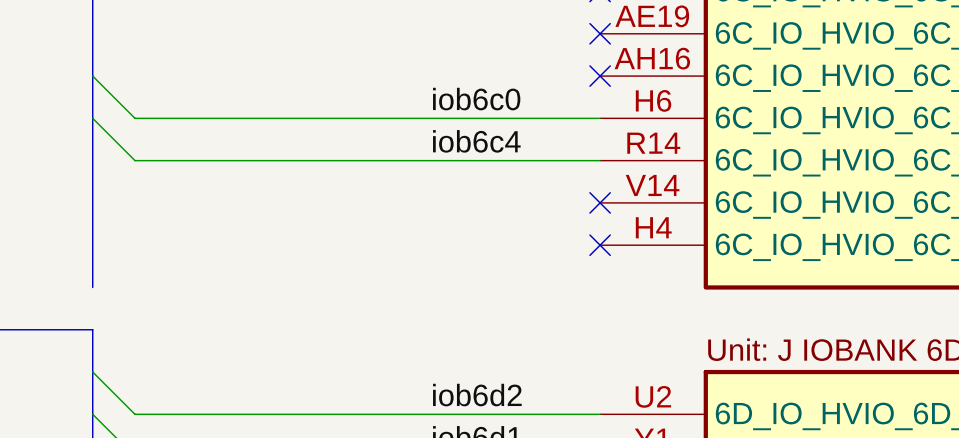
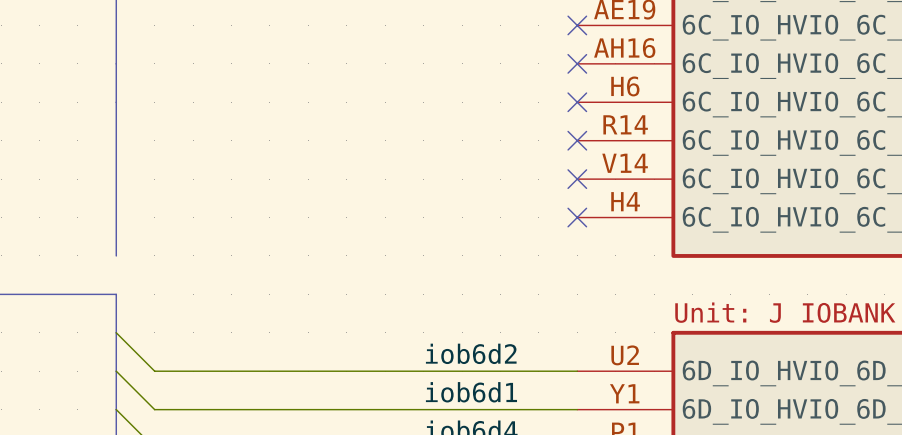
wire: (92, 76) (135, 118) (600, 118) -> none
label: iob6c0 (476, 99) -> none
wire: (92, 118) (135, 160) (600, 160) -> none
no-connect mark: none -> (577, 102)
label: iob6c4 (476, 141) -> none
no-connect mark: none -> (577, 140)

